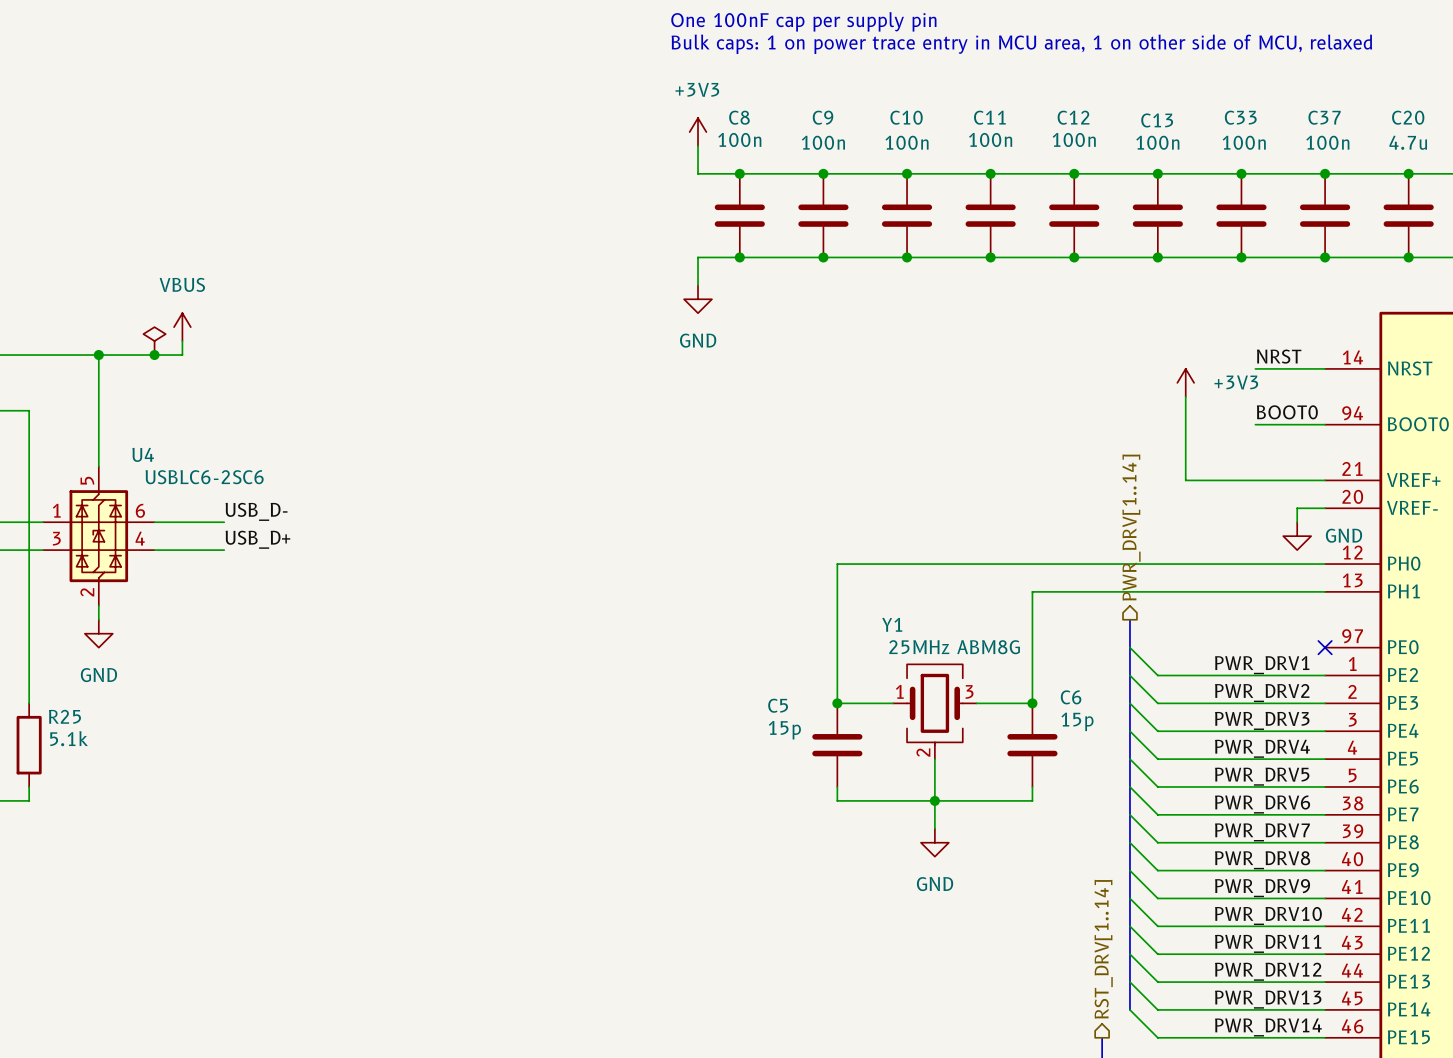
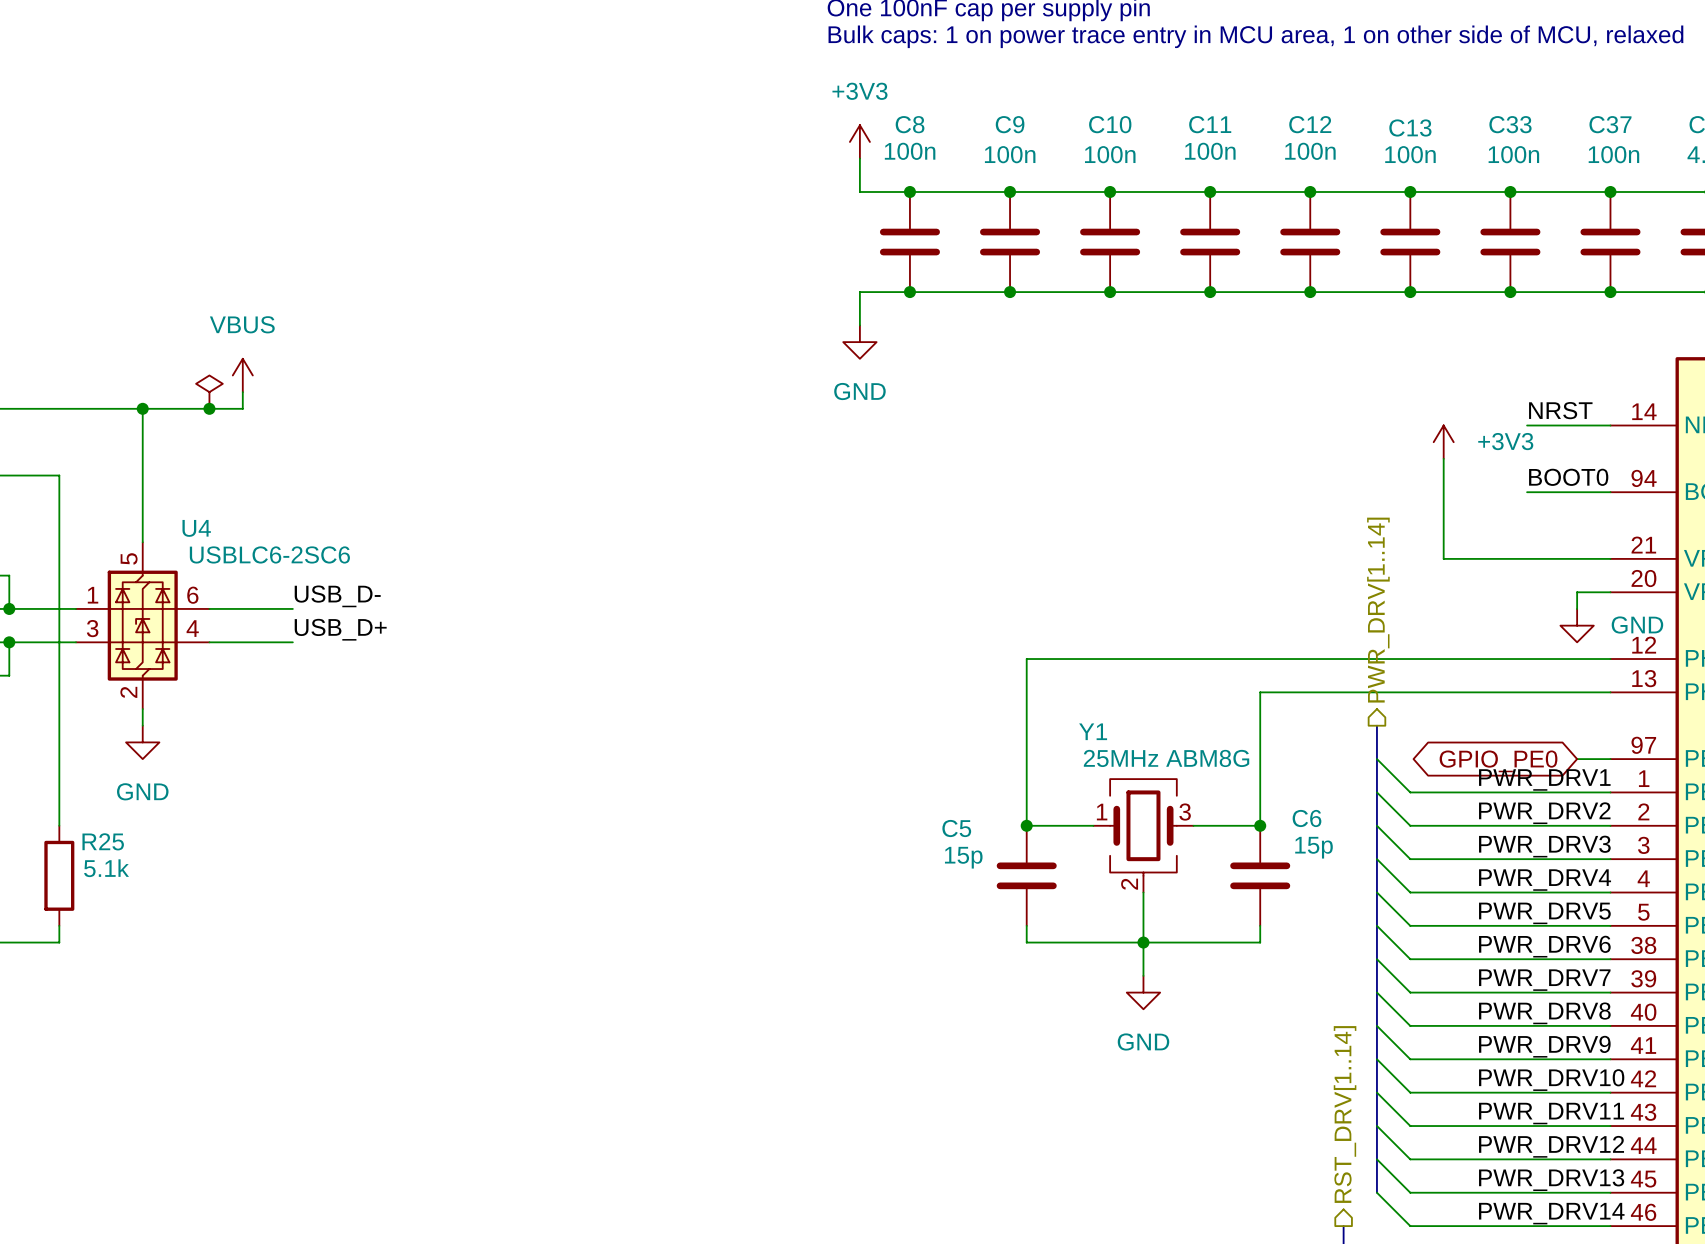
wire: none -> (1577, 759) (1610, 759)
no-connect mark: (1325, 647) -> none
global label: none -> GPIO_PE0 (1498, 761)

